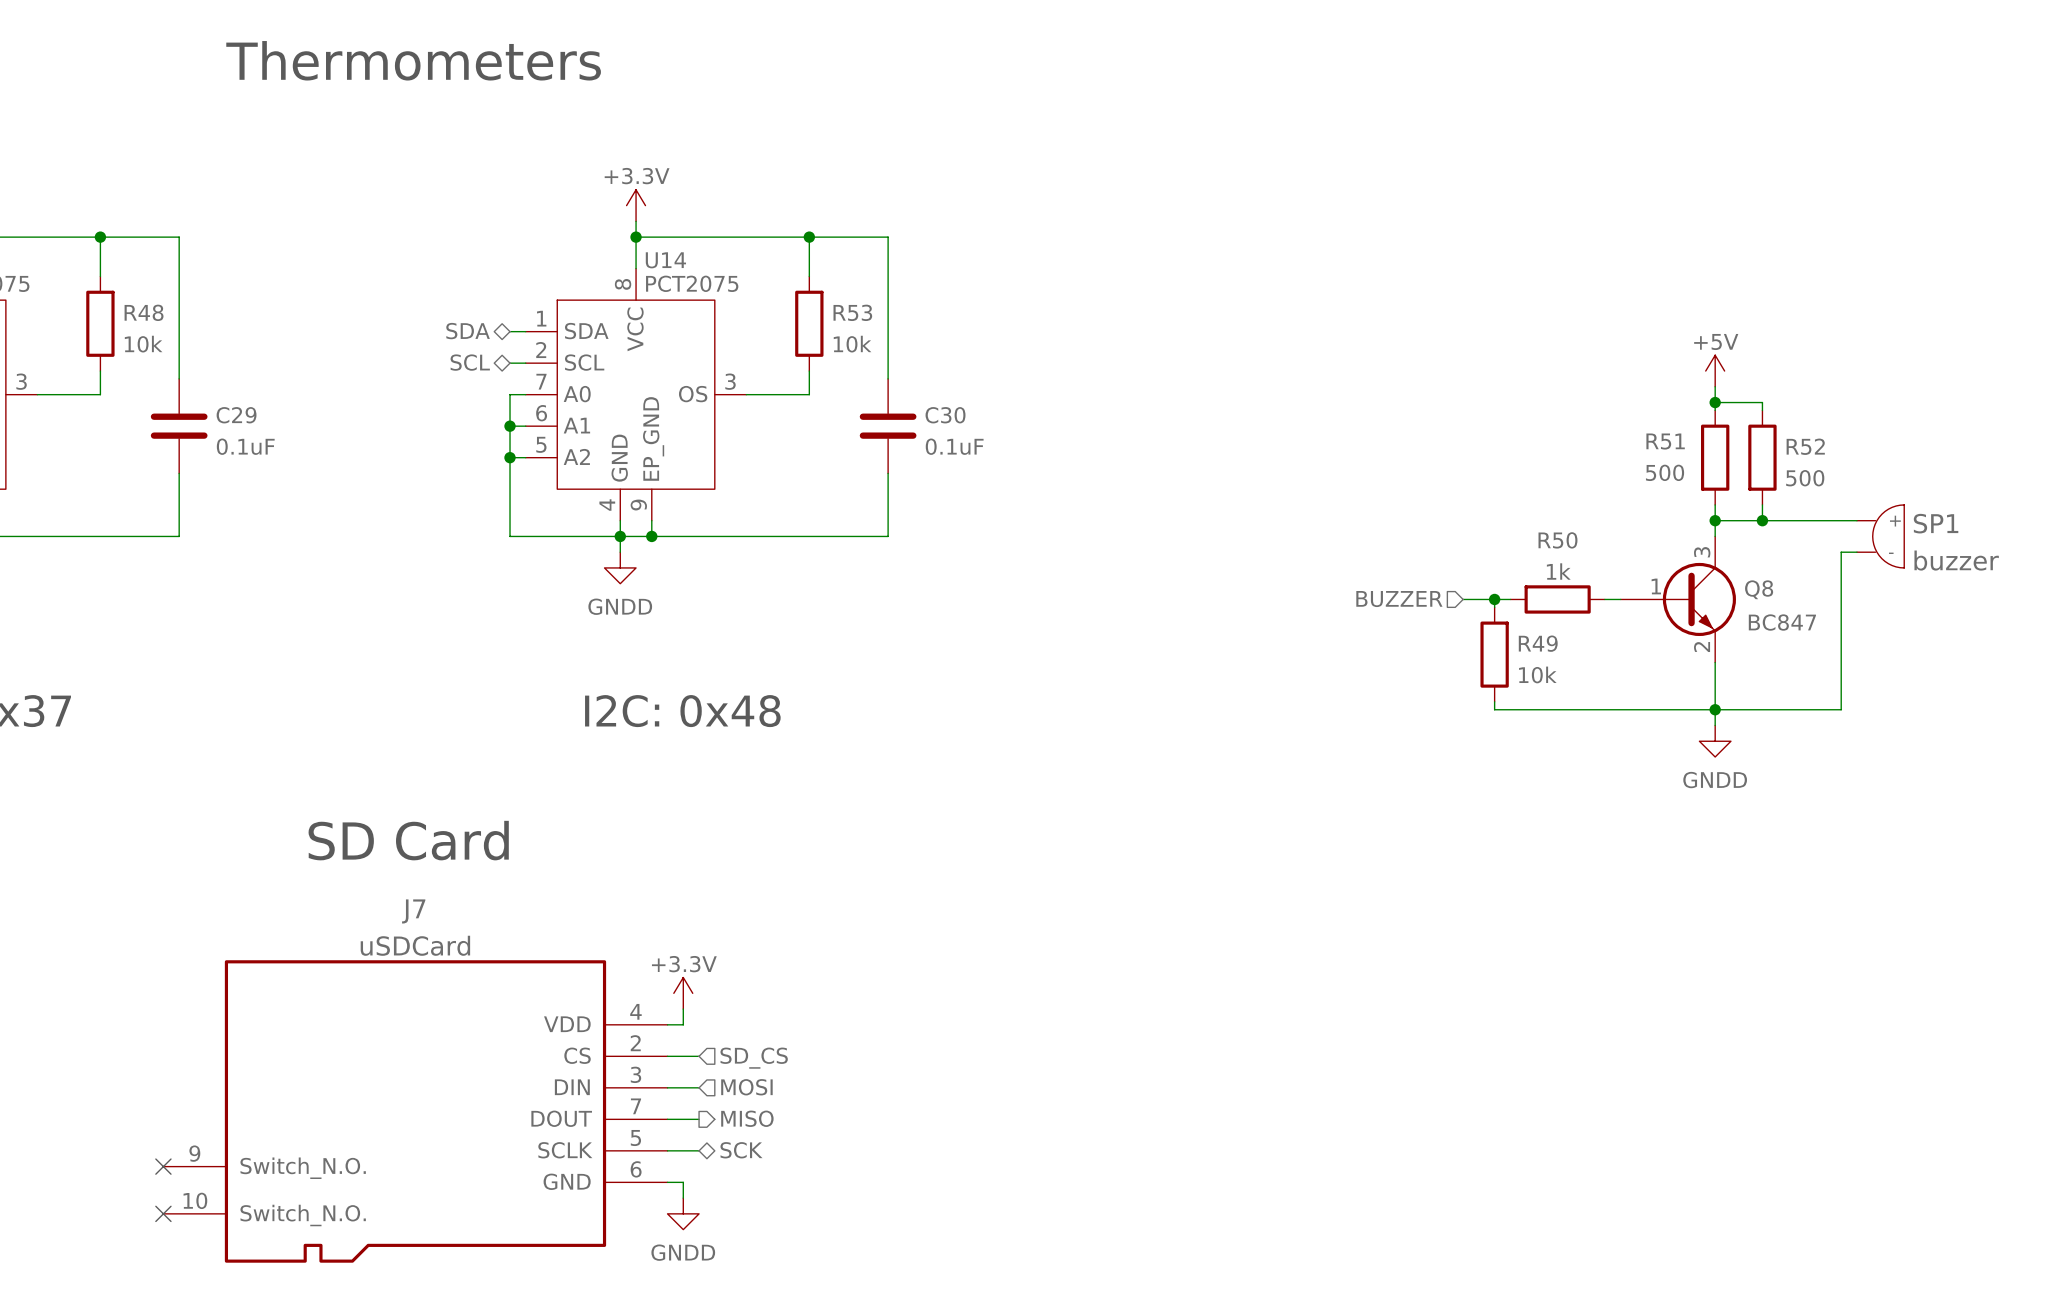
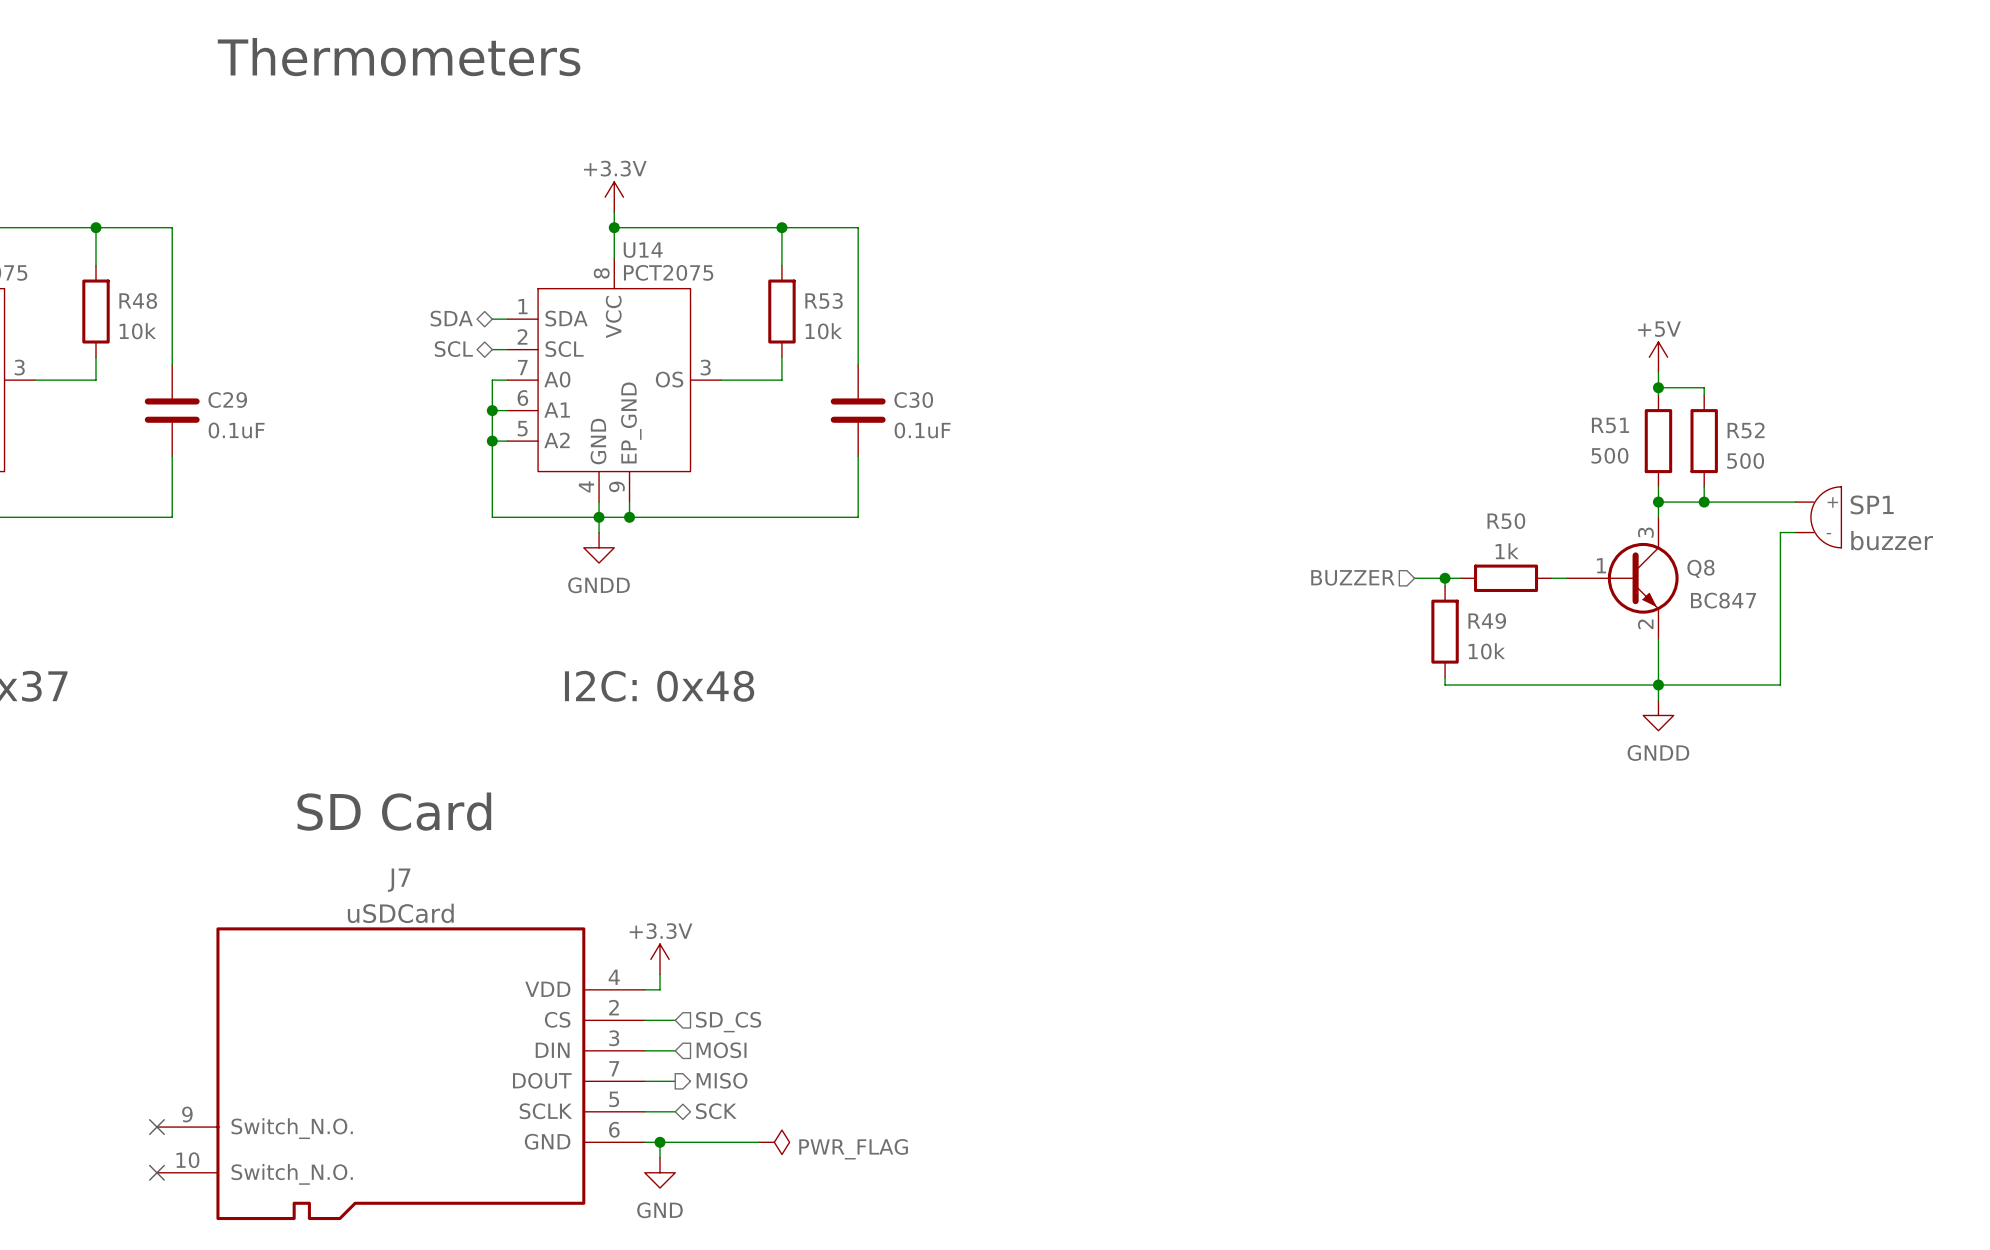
wire: none -> (660, 1142) (759, 1142)
junction: none -> (660, 1142)
power symbol: none -> PWR_FLAG (774, 1142)
power symbol: GNDD (683, 1213) -> GND (660, 1172)

